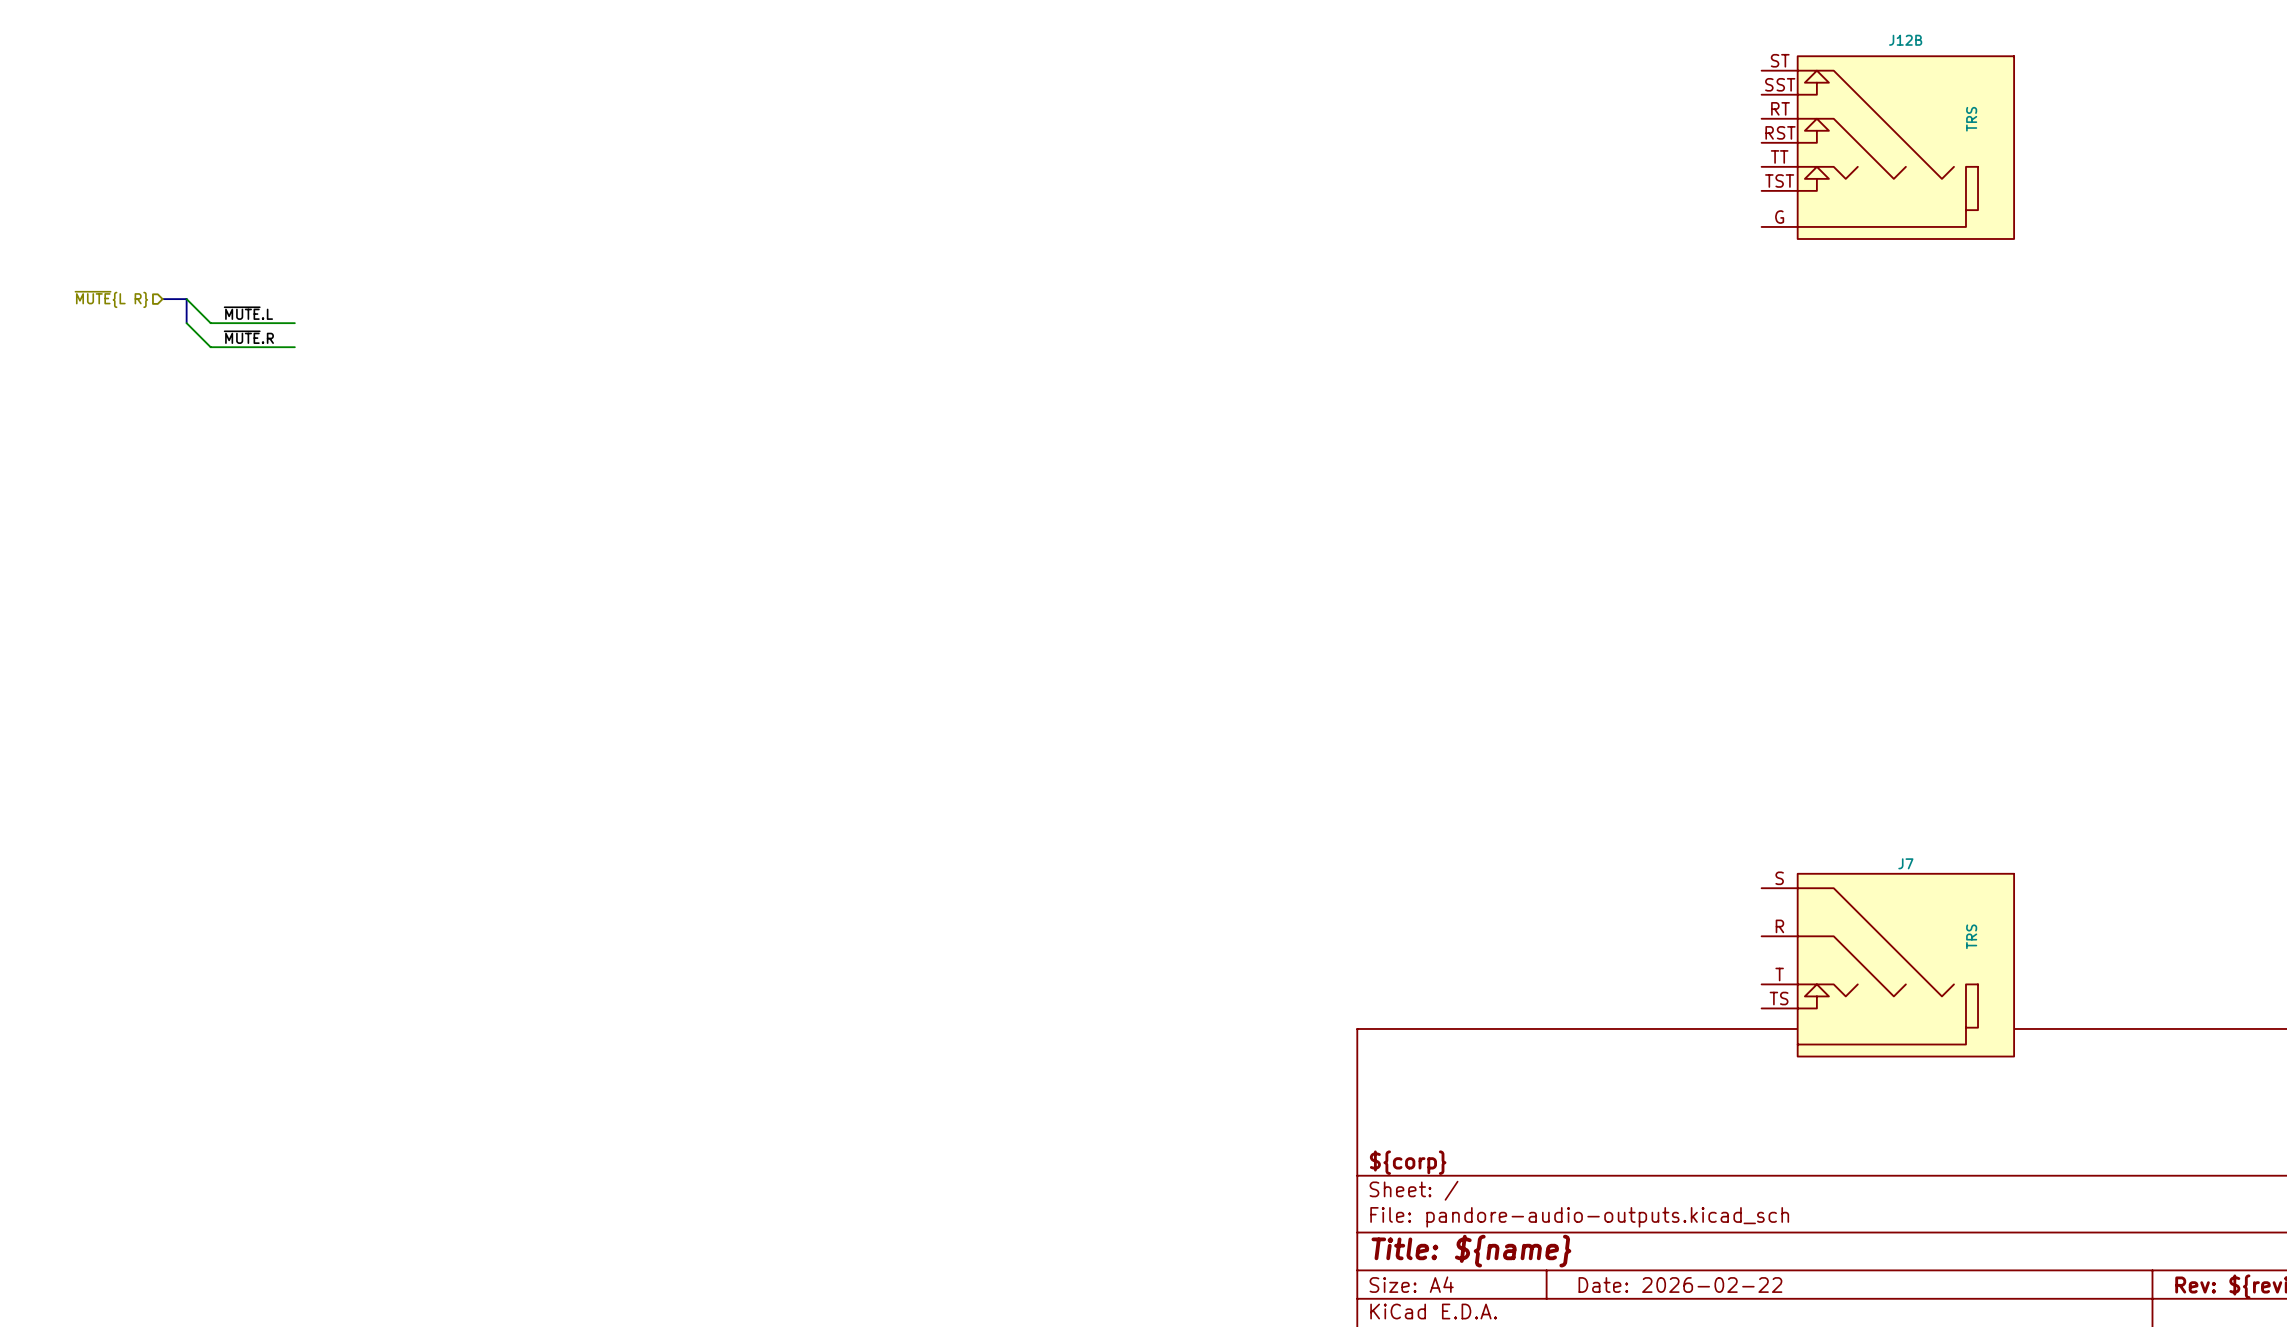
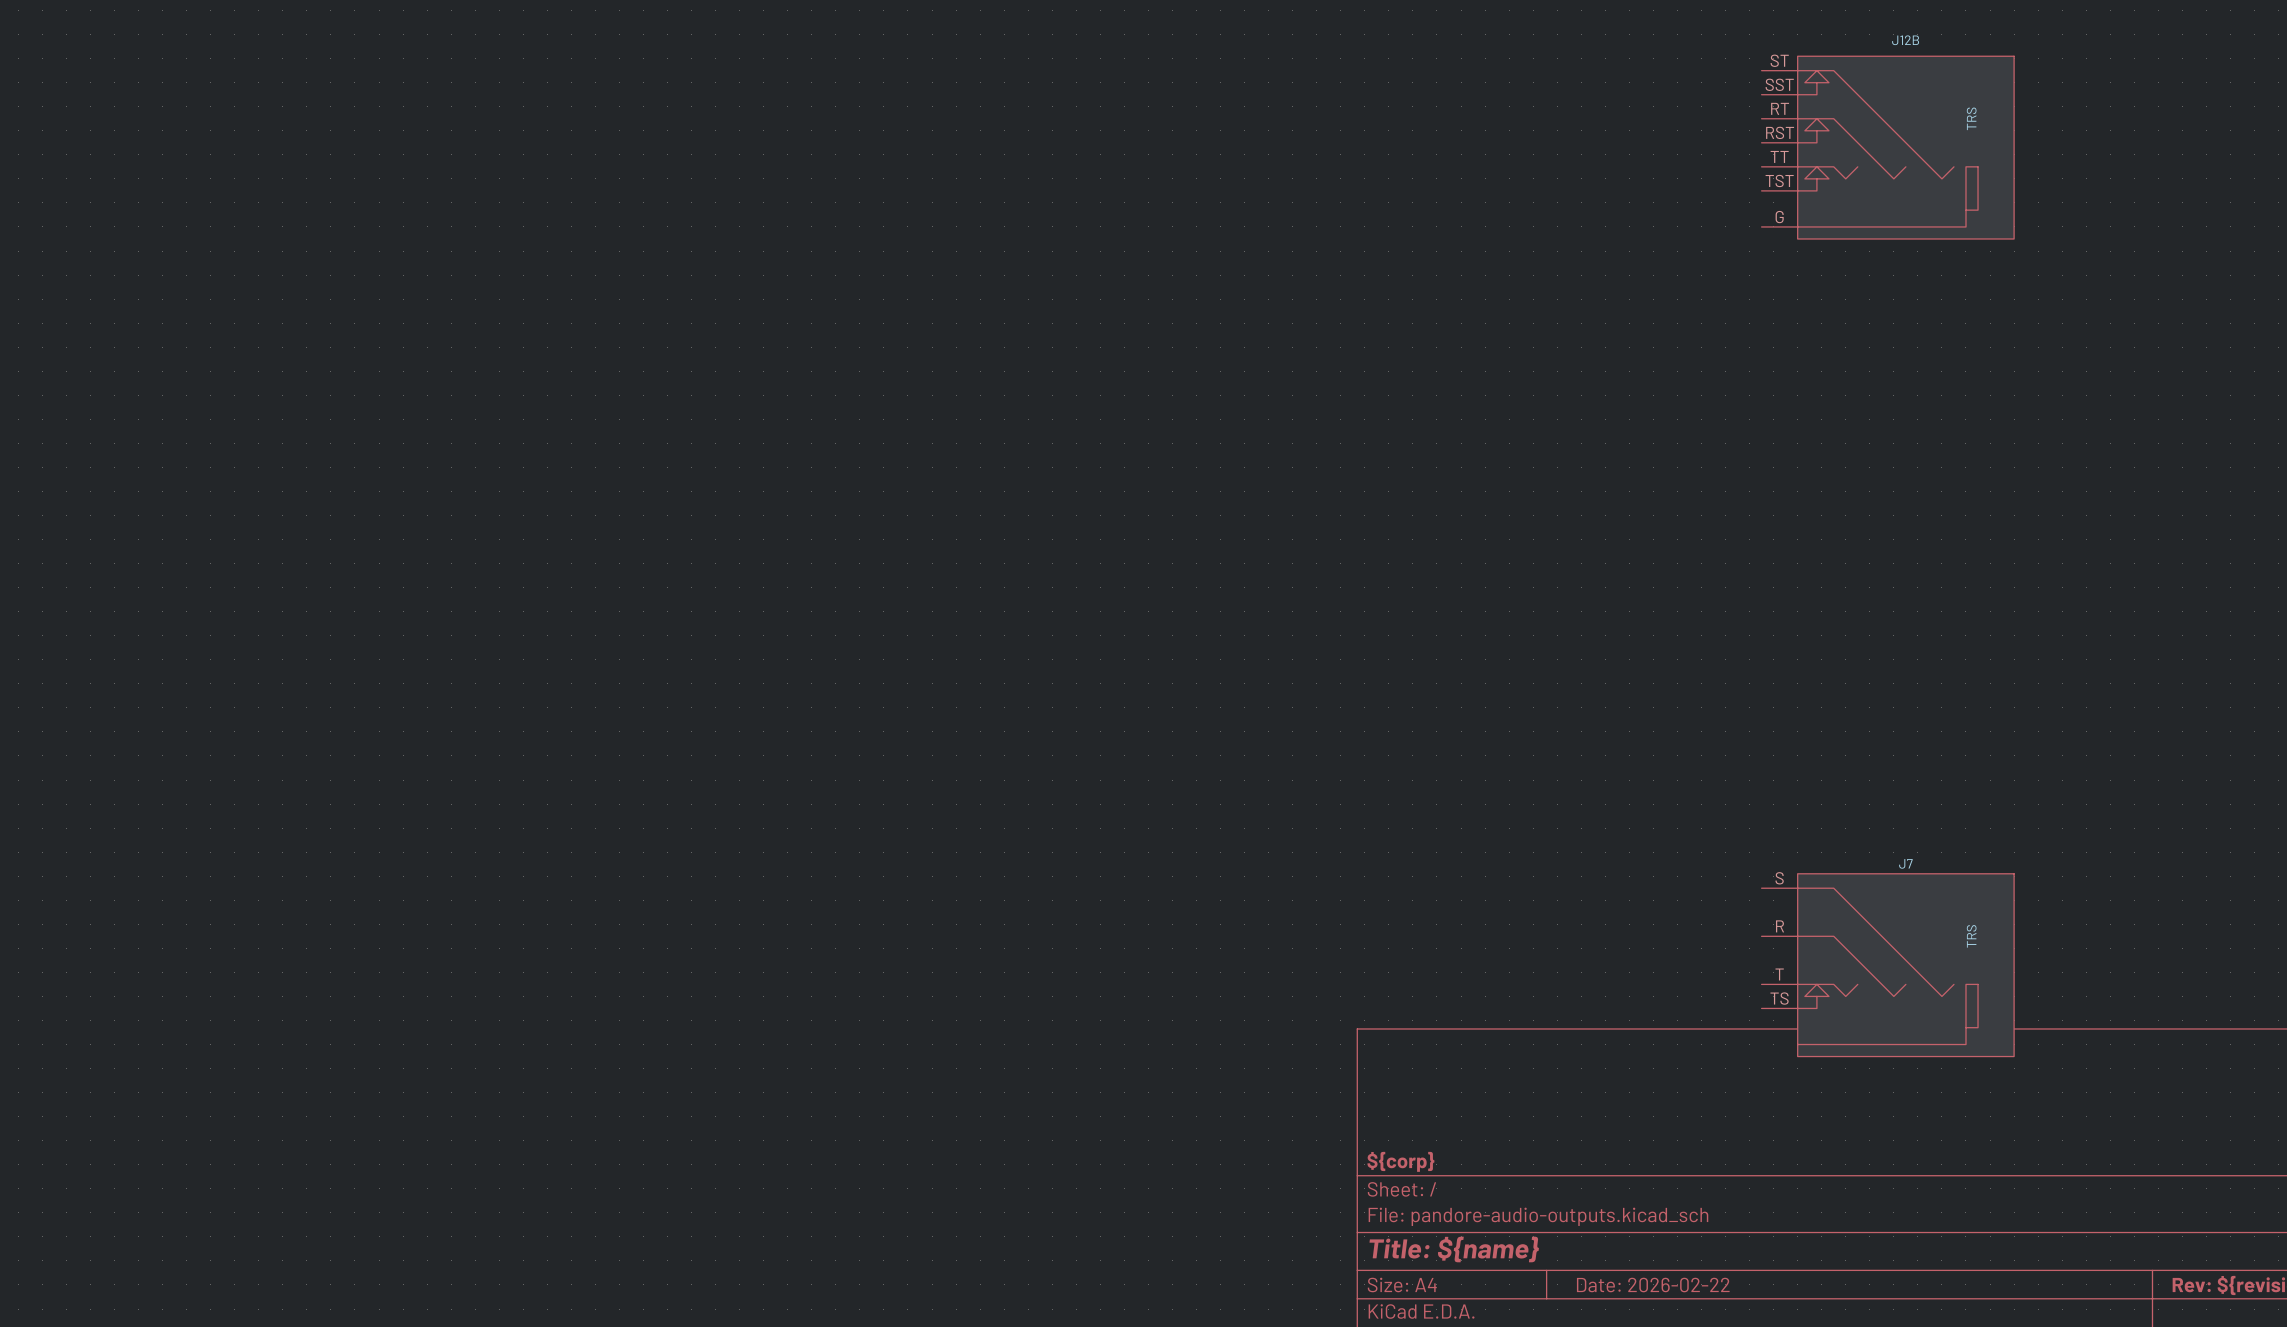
hierarchical label: ~{MUTE}{L R} (111, 299) -> none
bus: (162, 299) (186, 299) (186, 323) -> none
wire: (186, 299) (210, 323) (294, 323) -> none
label: ~{MUTE}.L (248, 313) -> none
wire: (186, 323) (210, 347) (294, 347) -> none
label: ~{MUTE}.R (248, 337) -> none

